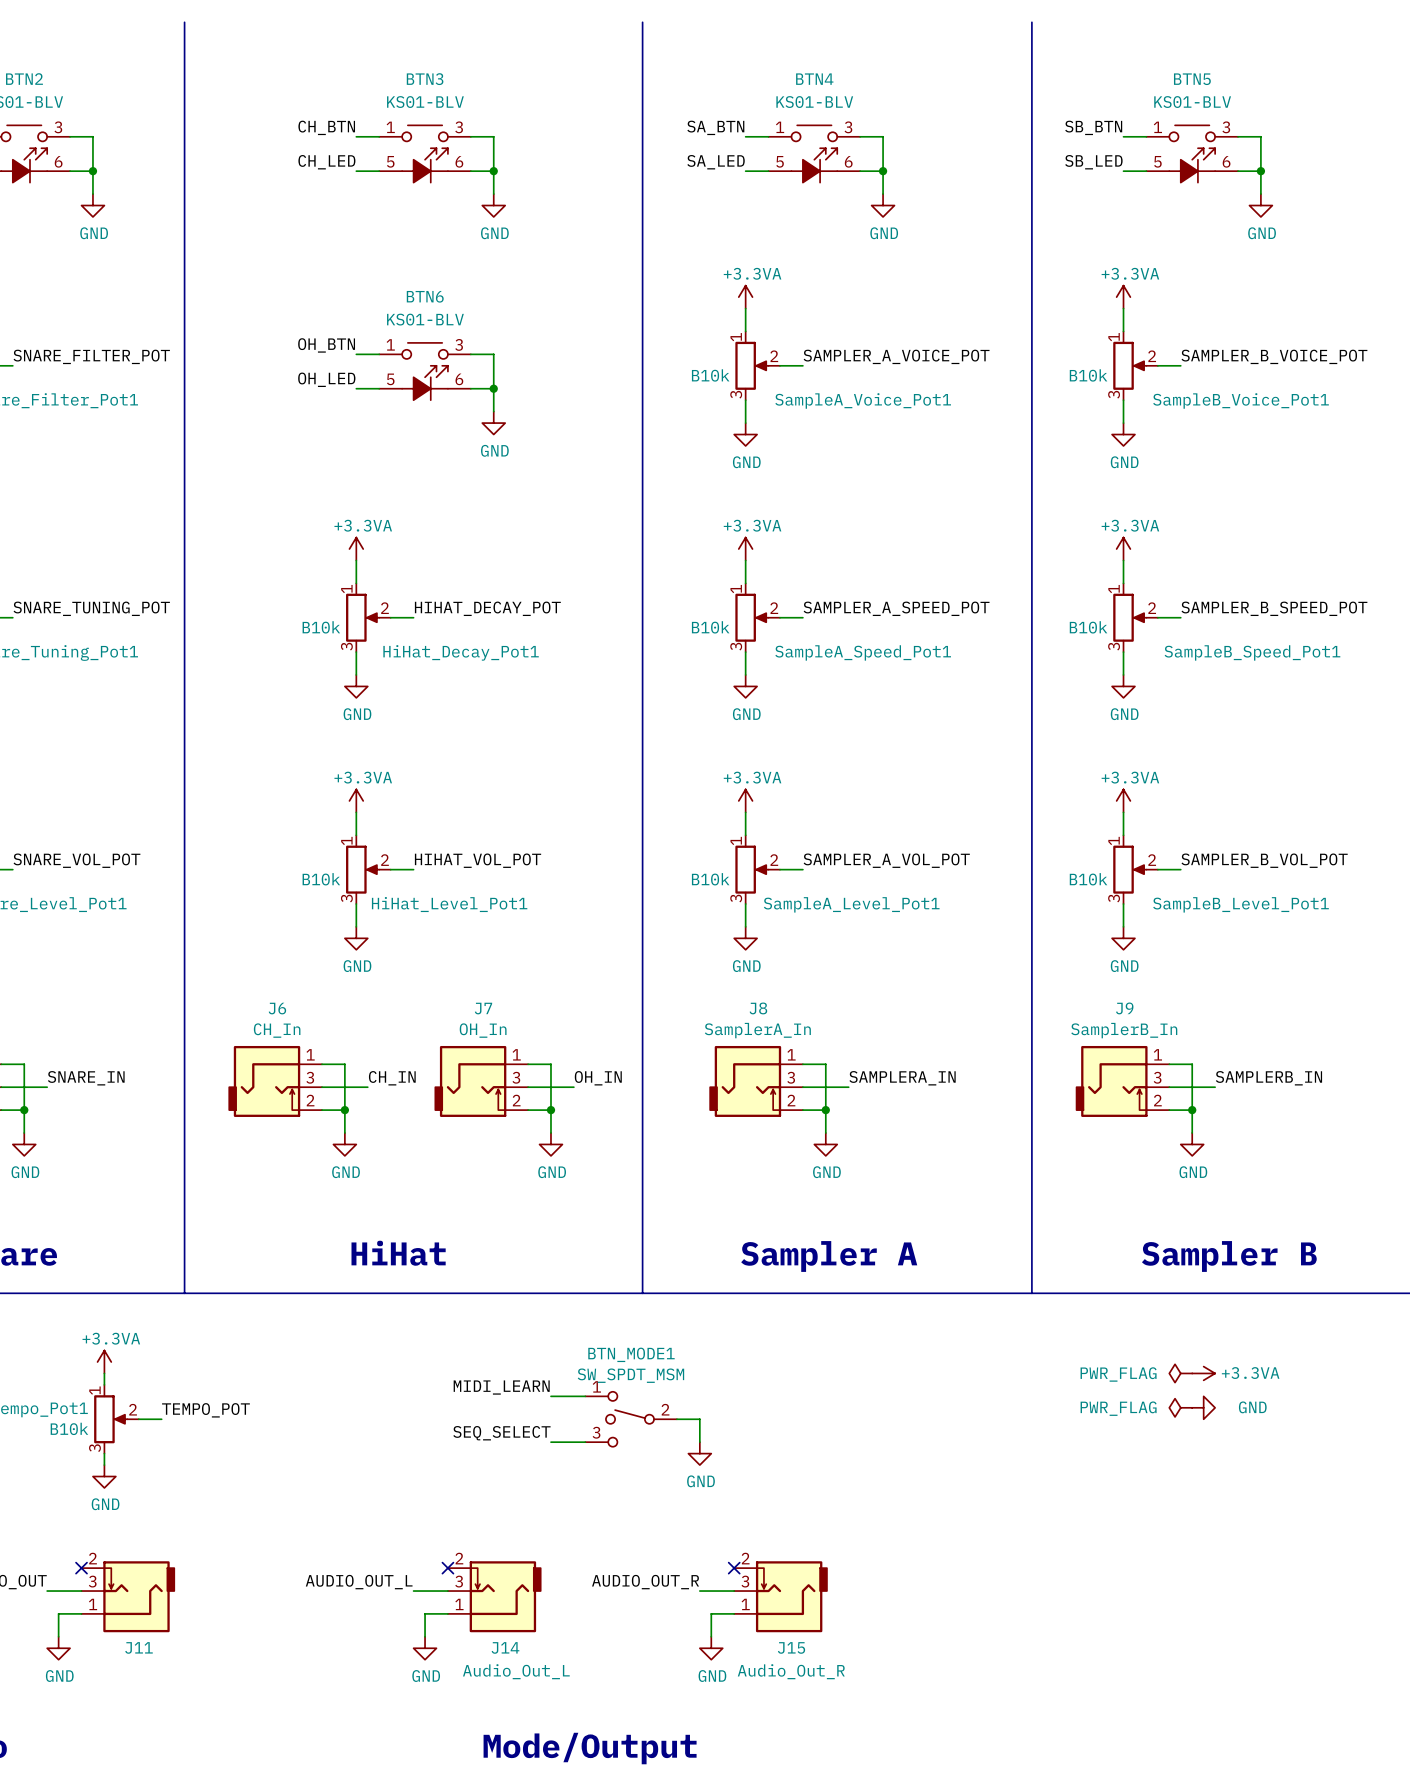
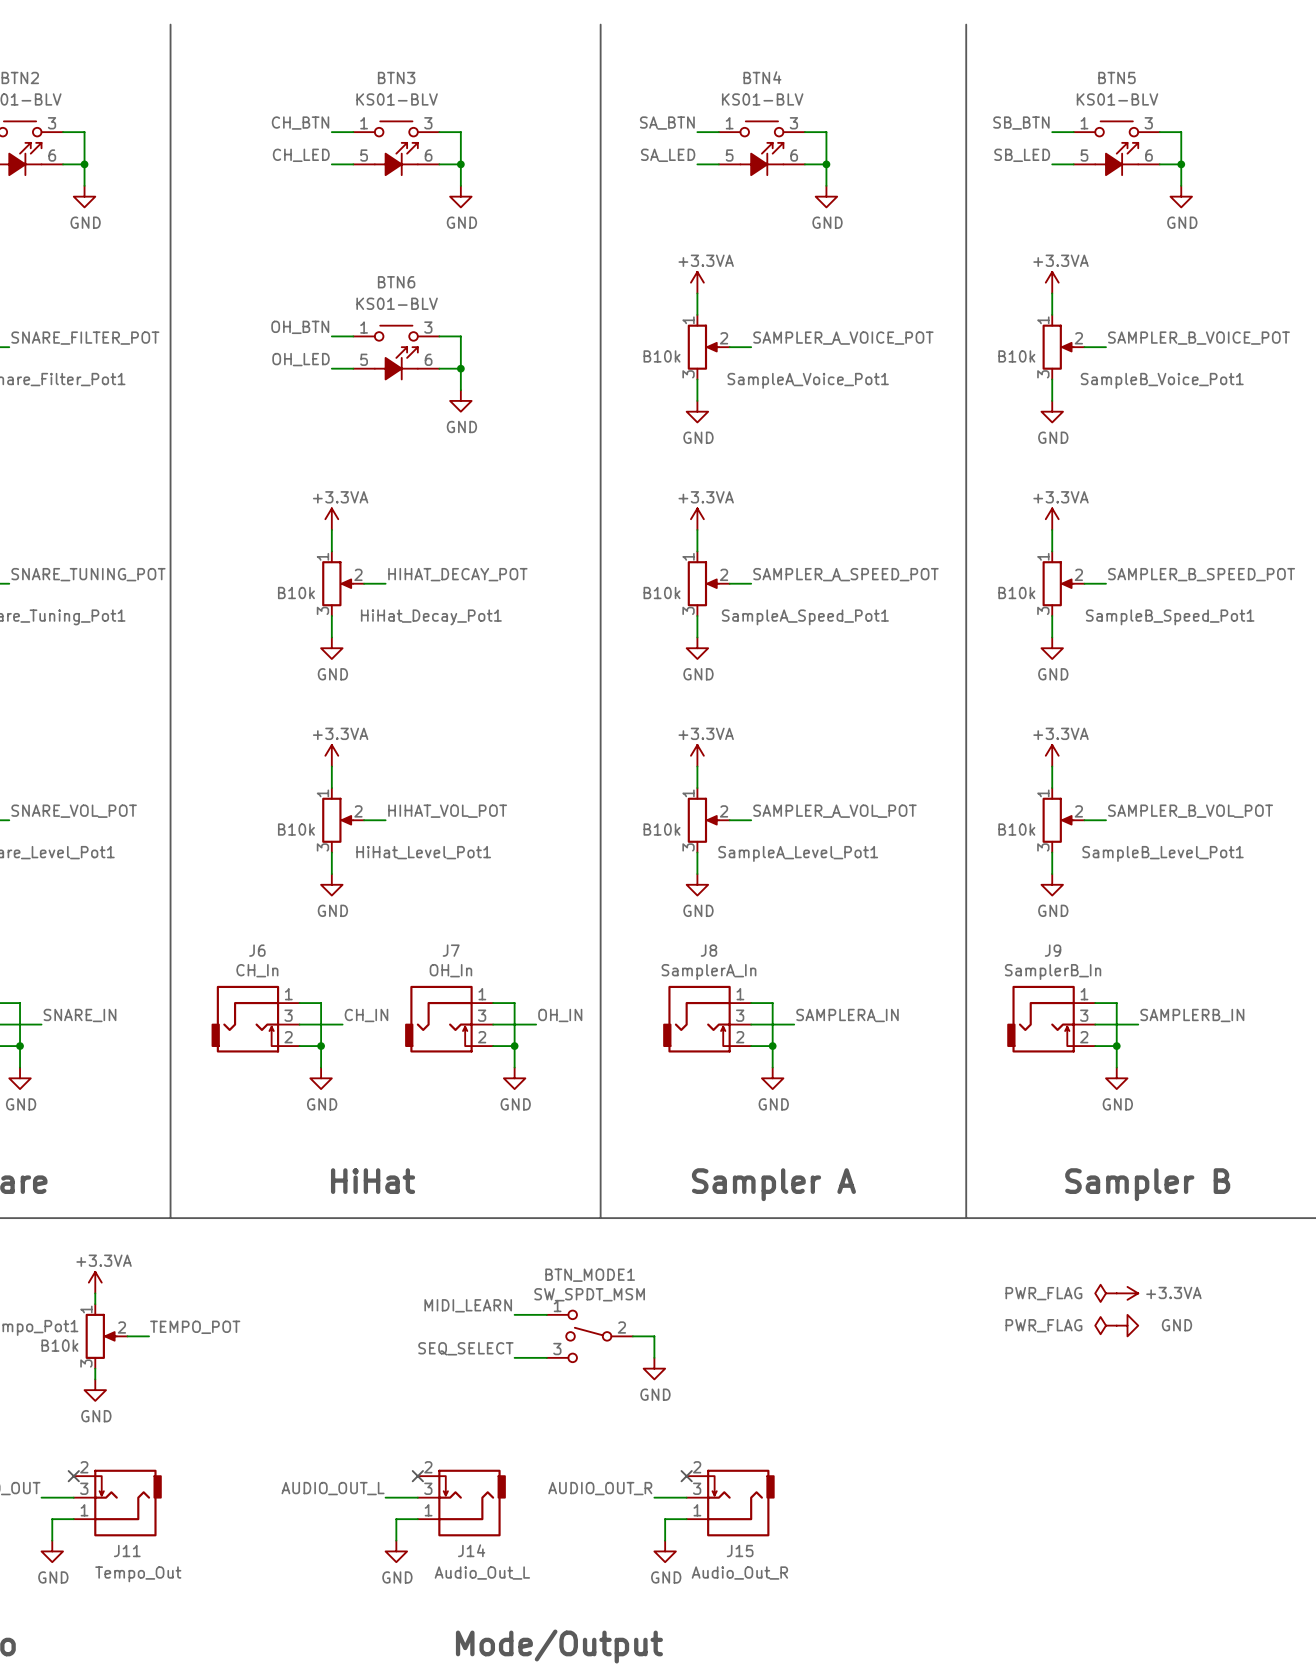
J11 value: none -> Tempo_Out (138, 1574)

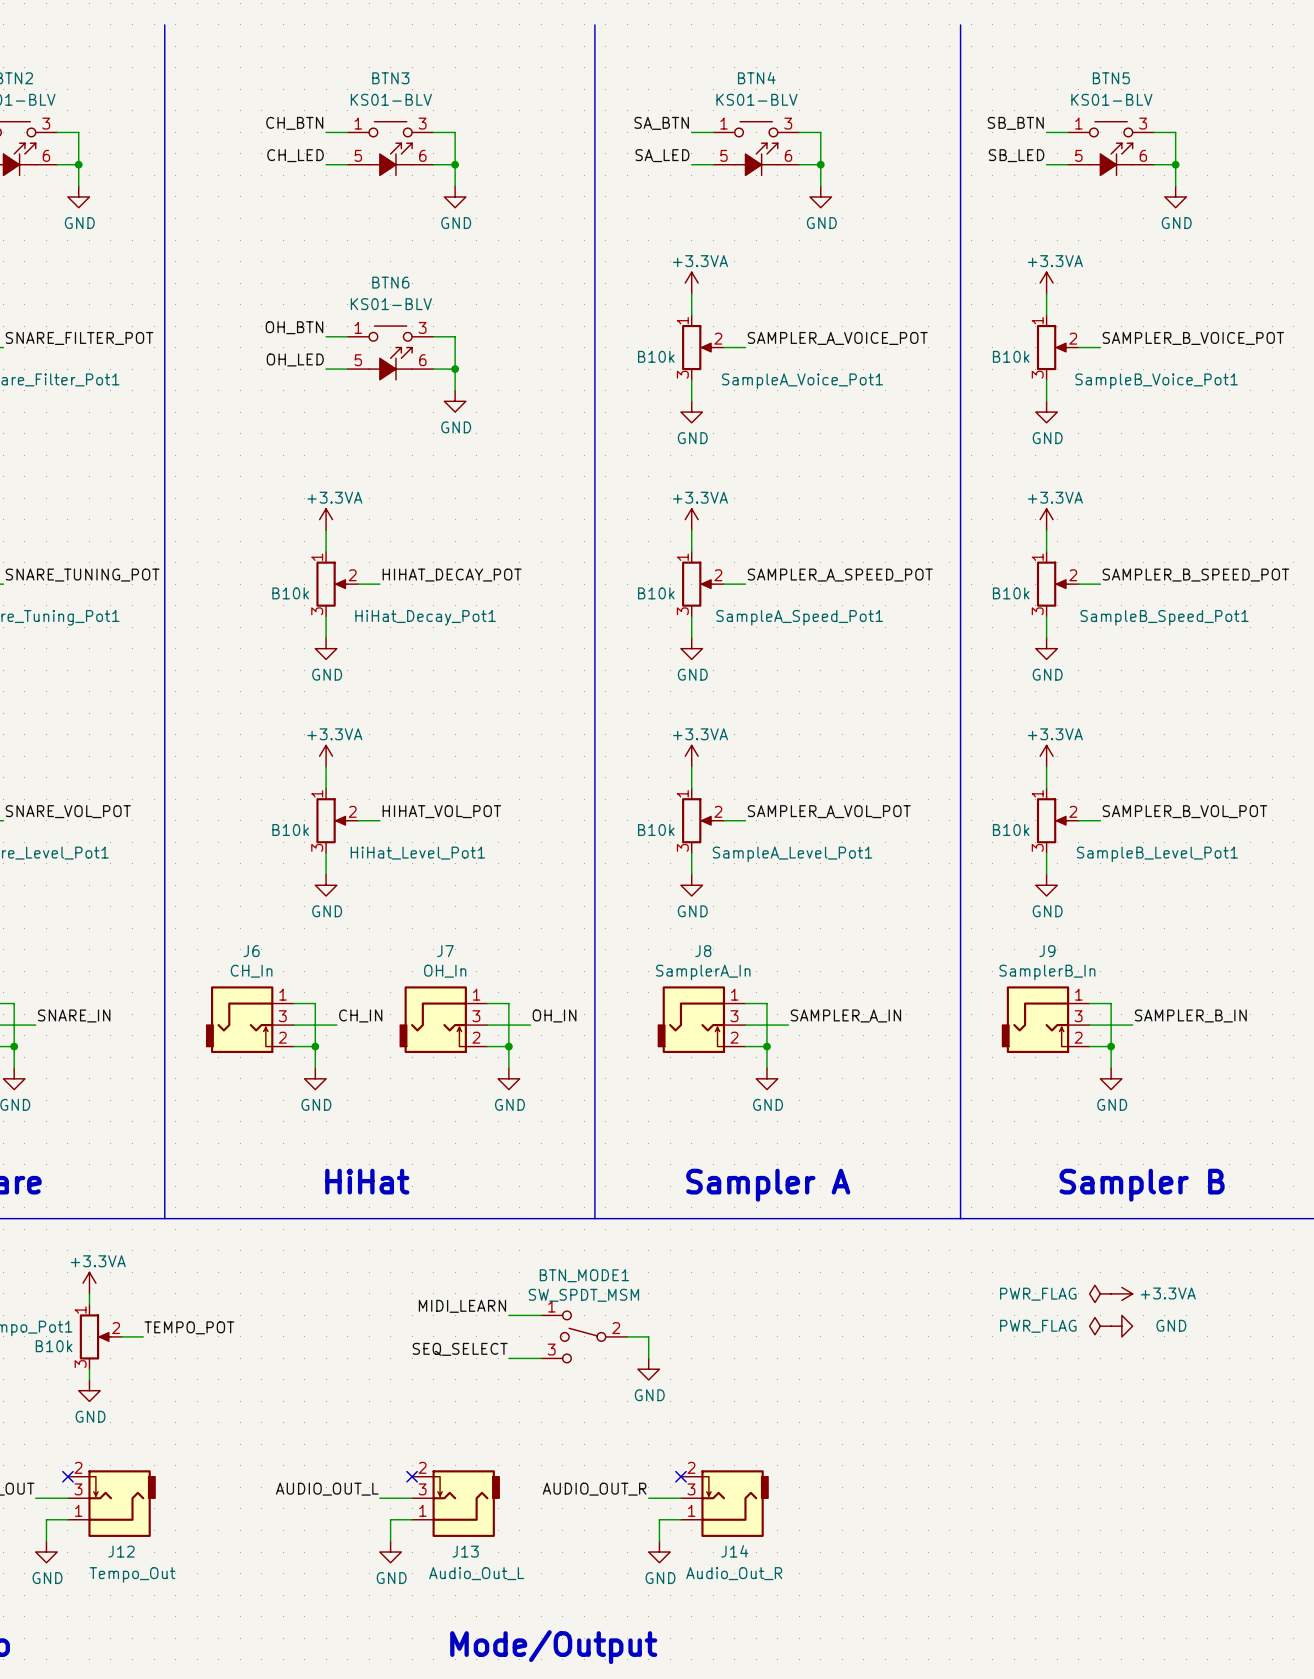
label: SAMPLERA_IN (847, 1015) -> SAMPLER_A_IN (845, 1015)
label: SAMPLERB_IN (1192, 1015) -> SAMPLER_B_IN (1190, 1015)
J14 name: J14 (471, 1550) -> J13 (465, 1551)
J11 name: J11 (127, 1551) -> J12 (121, 1551)
J15 name: J15 (740, 1551) -> J14 (734, 1551)

